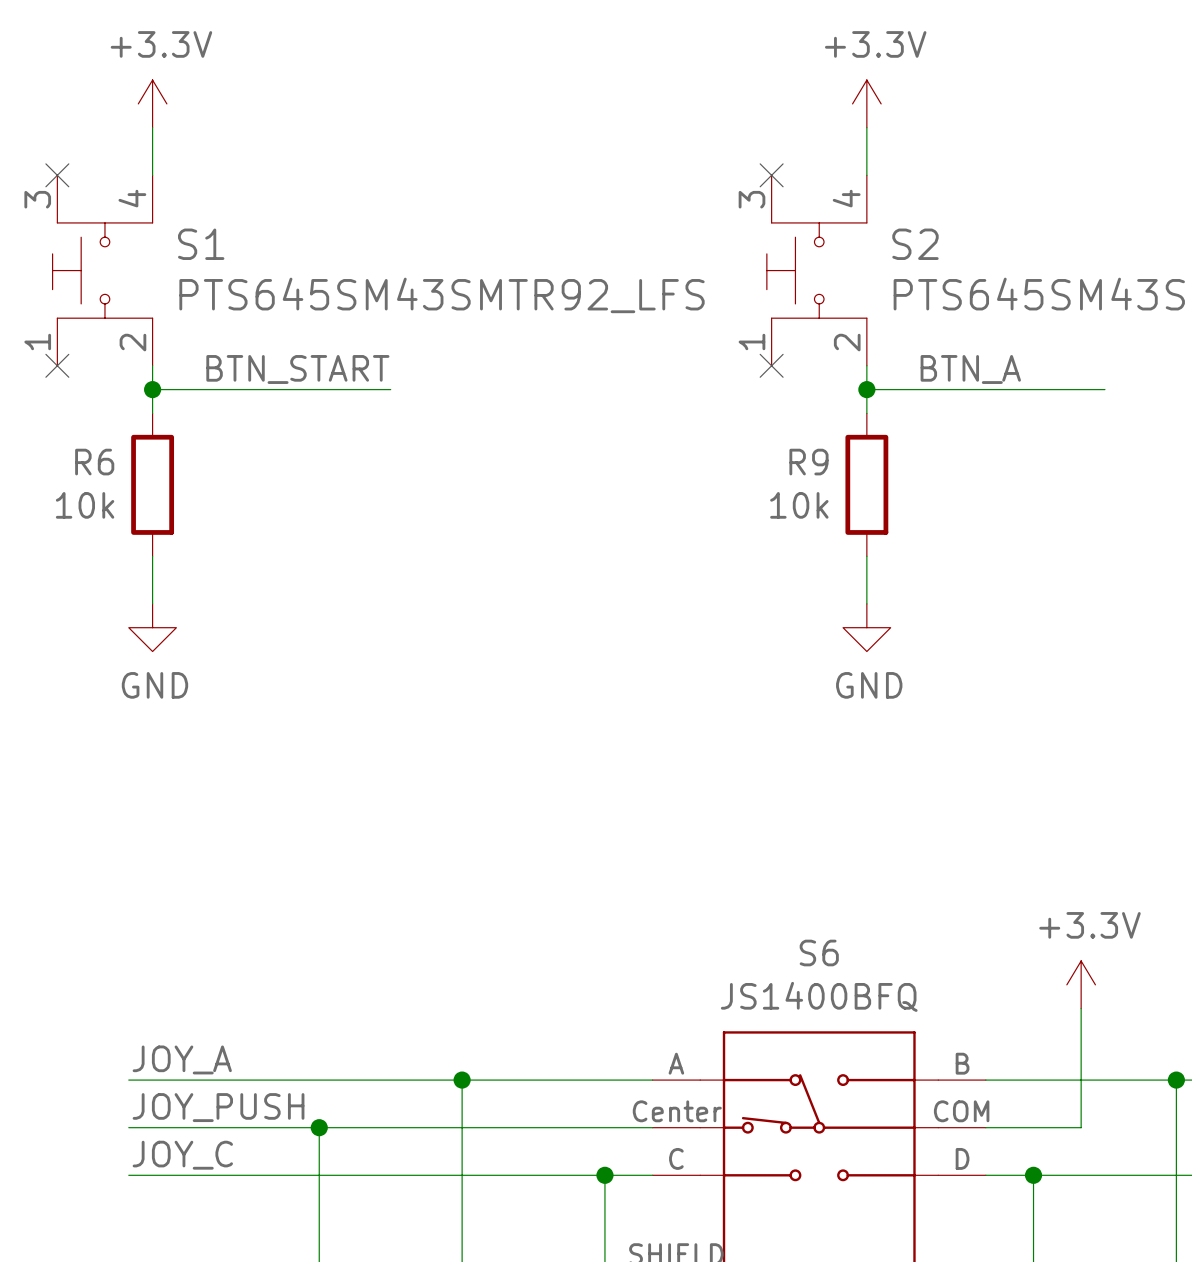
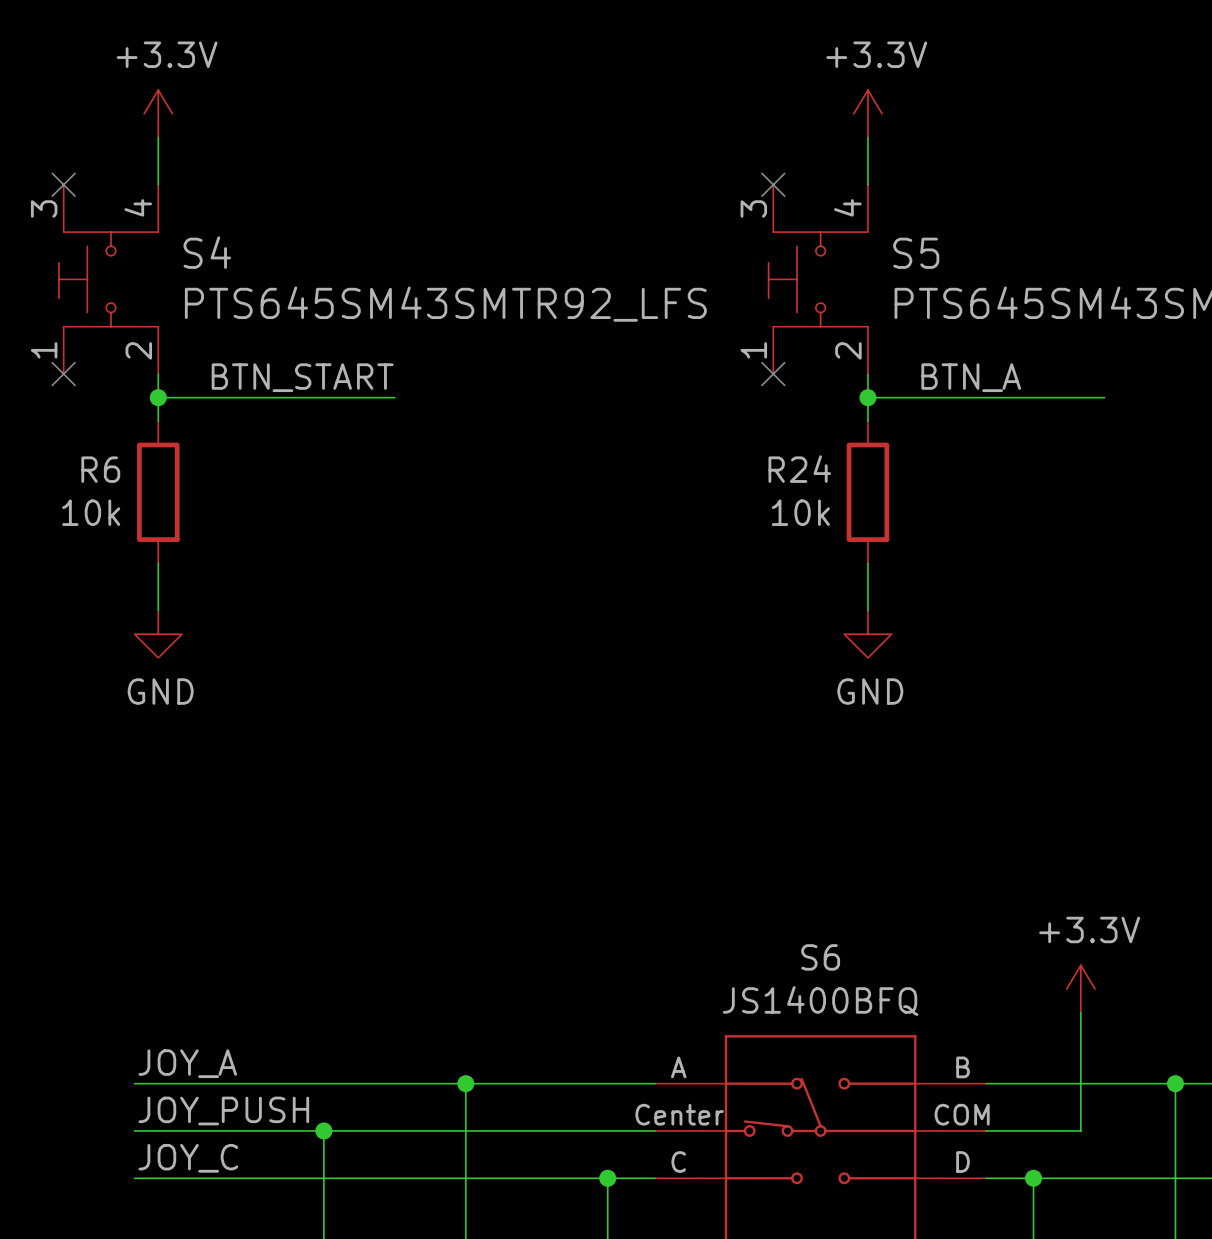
S1 name: S1 (201, 244) -> S4 (207, 252)
S2 name: S2 (915, 244) -> S5 (916, 253)
R9 name: R9 (808, 462) -> R24 (799, 469)

